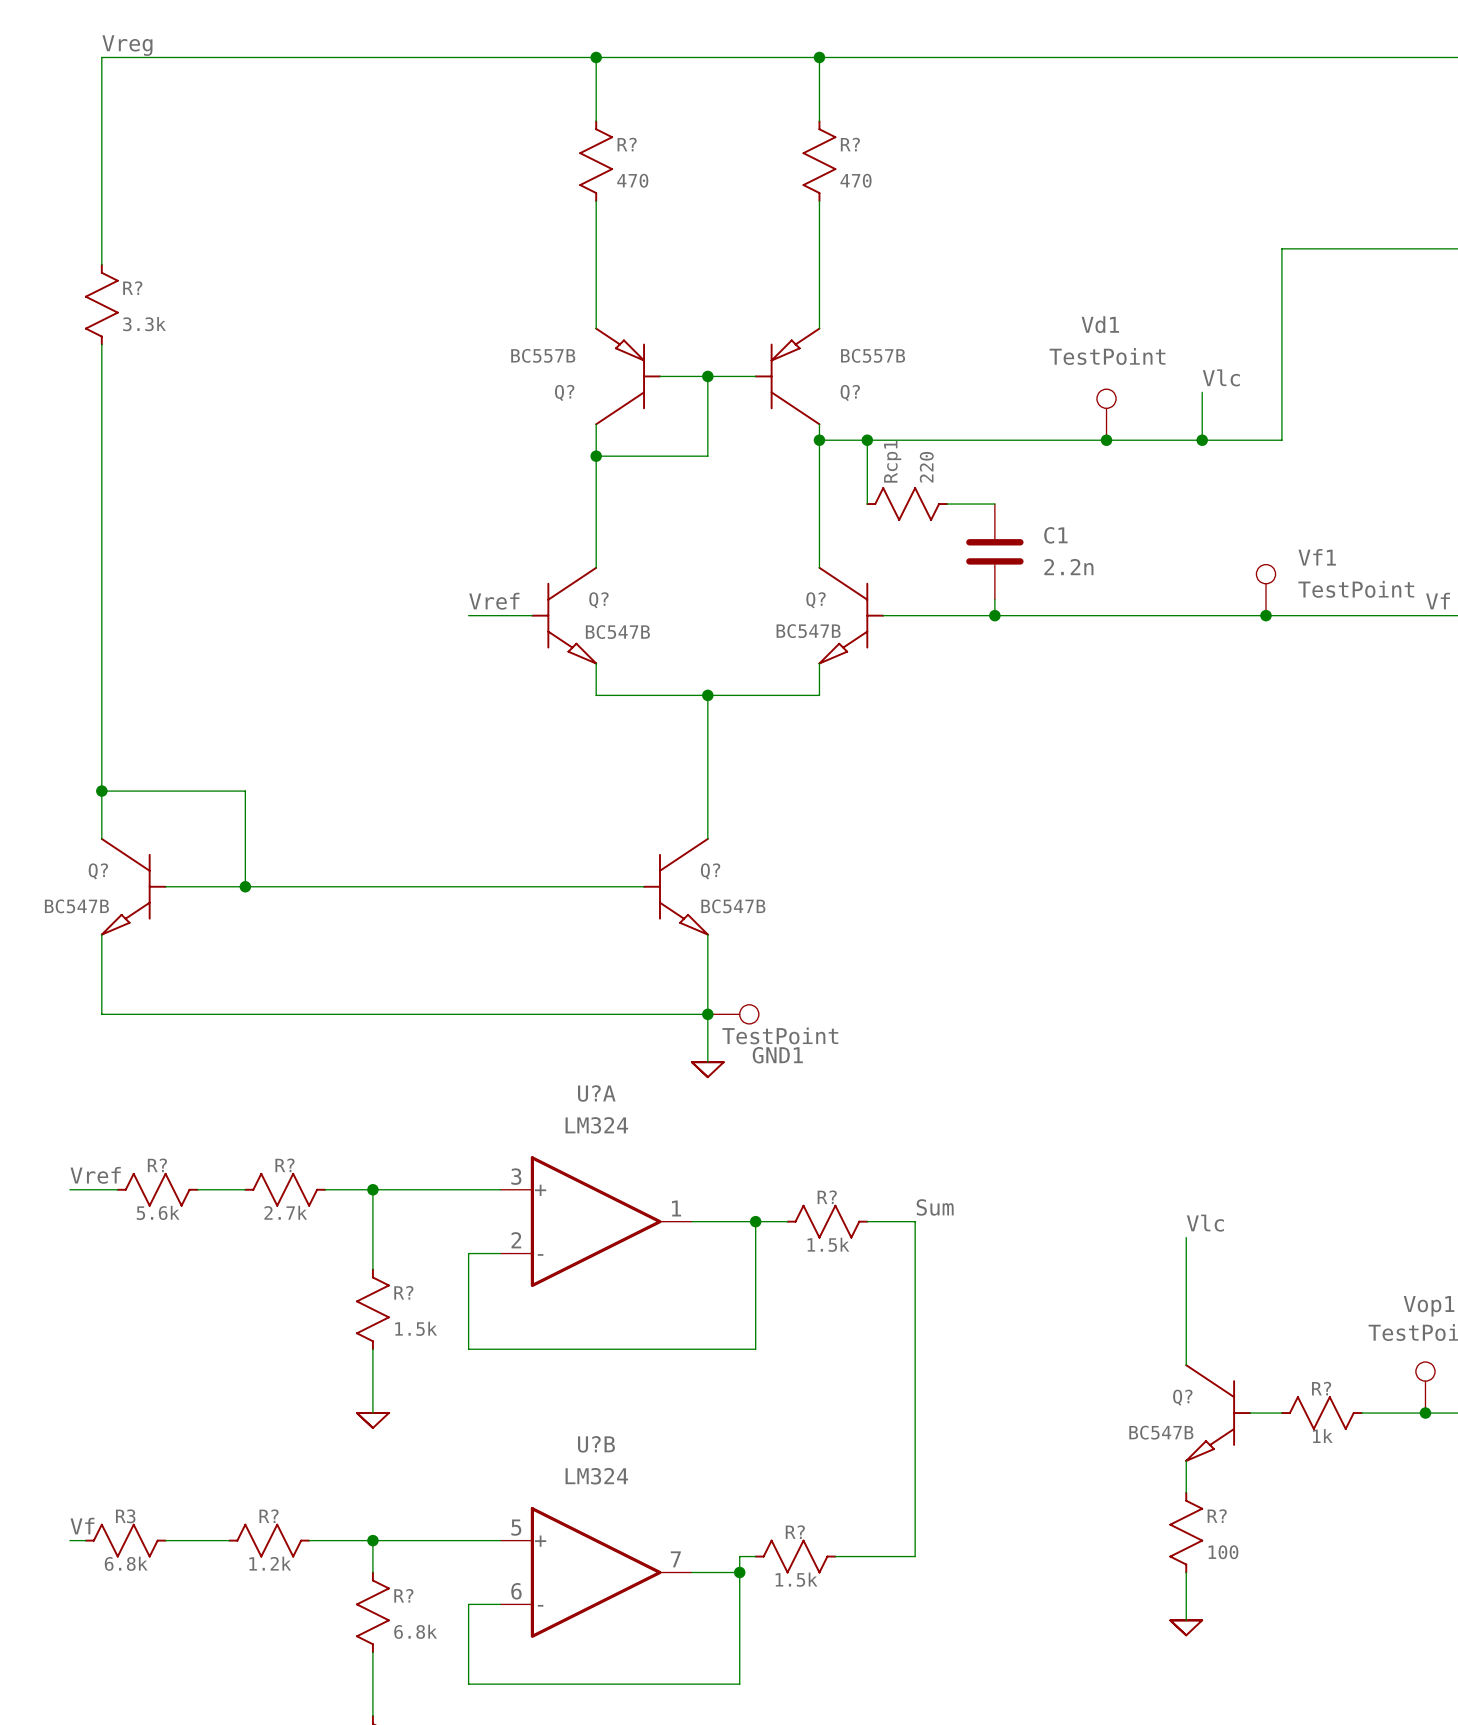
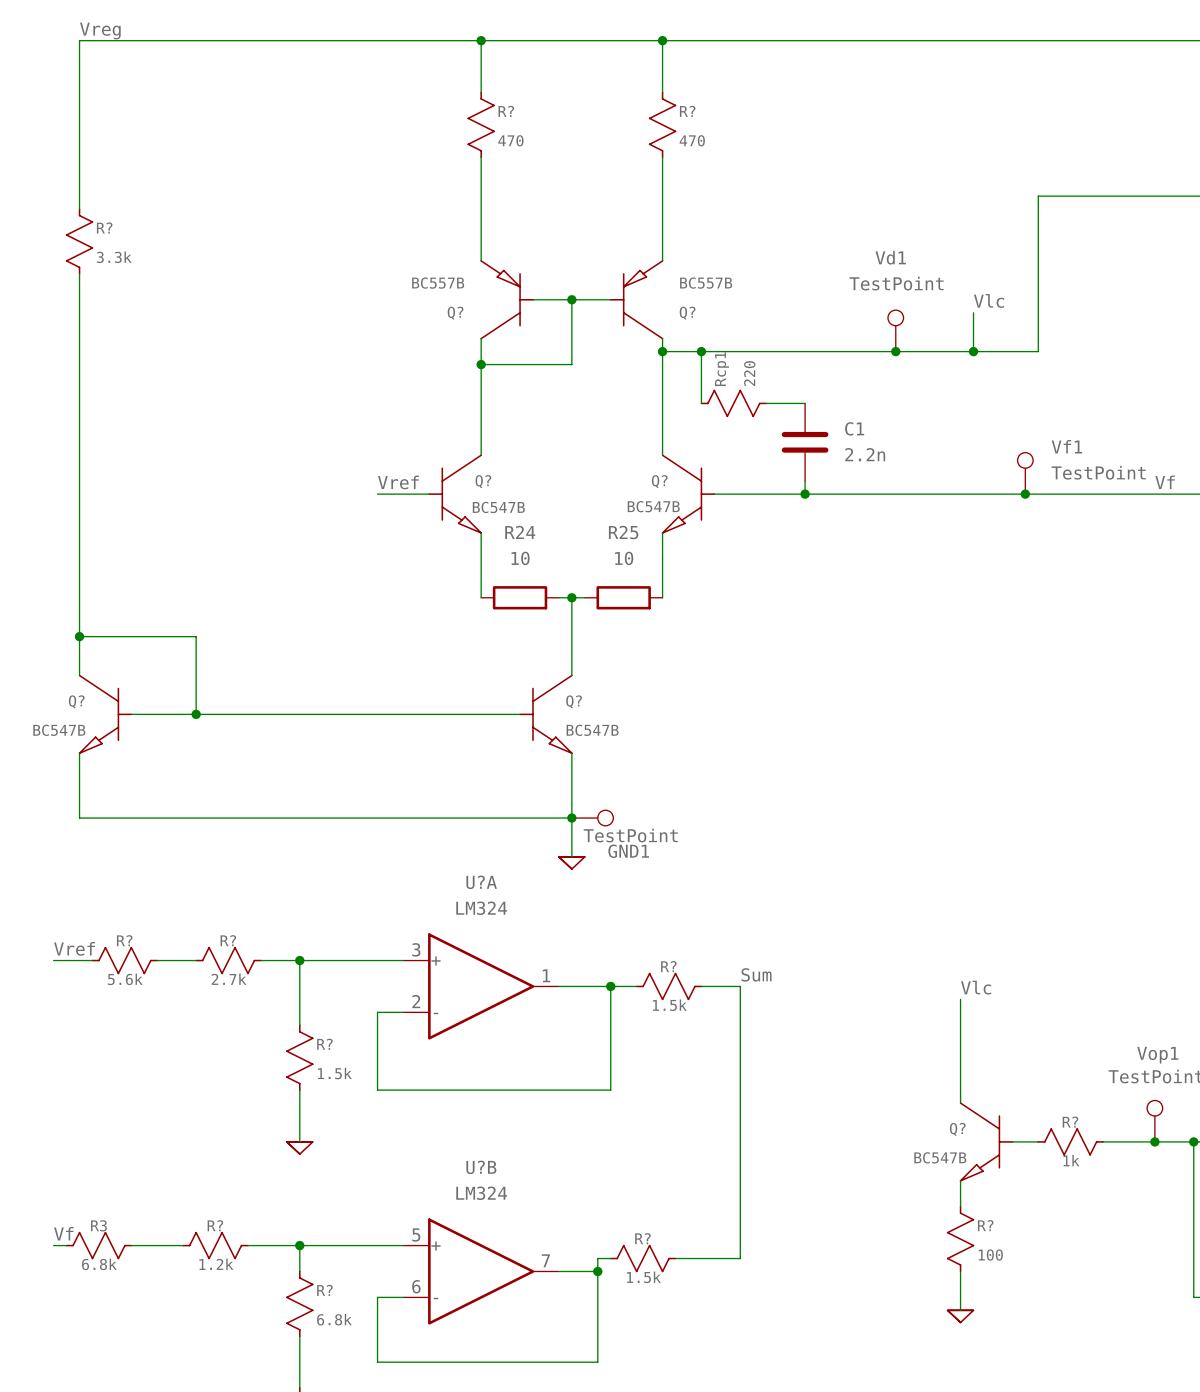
wire: (596, 695) (819, 695) -> (481, 558) (481, 597)
wire: (707, 695) (707, 743) -> (662, 558) (662, 597)
junction position: (707, 695) -> (571, 597)
R24: none -> 10 (520, 597)
wire: none -> (558, 597) (584, 597)
R25: none -> 10 (623, 597)

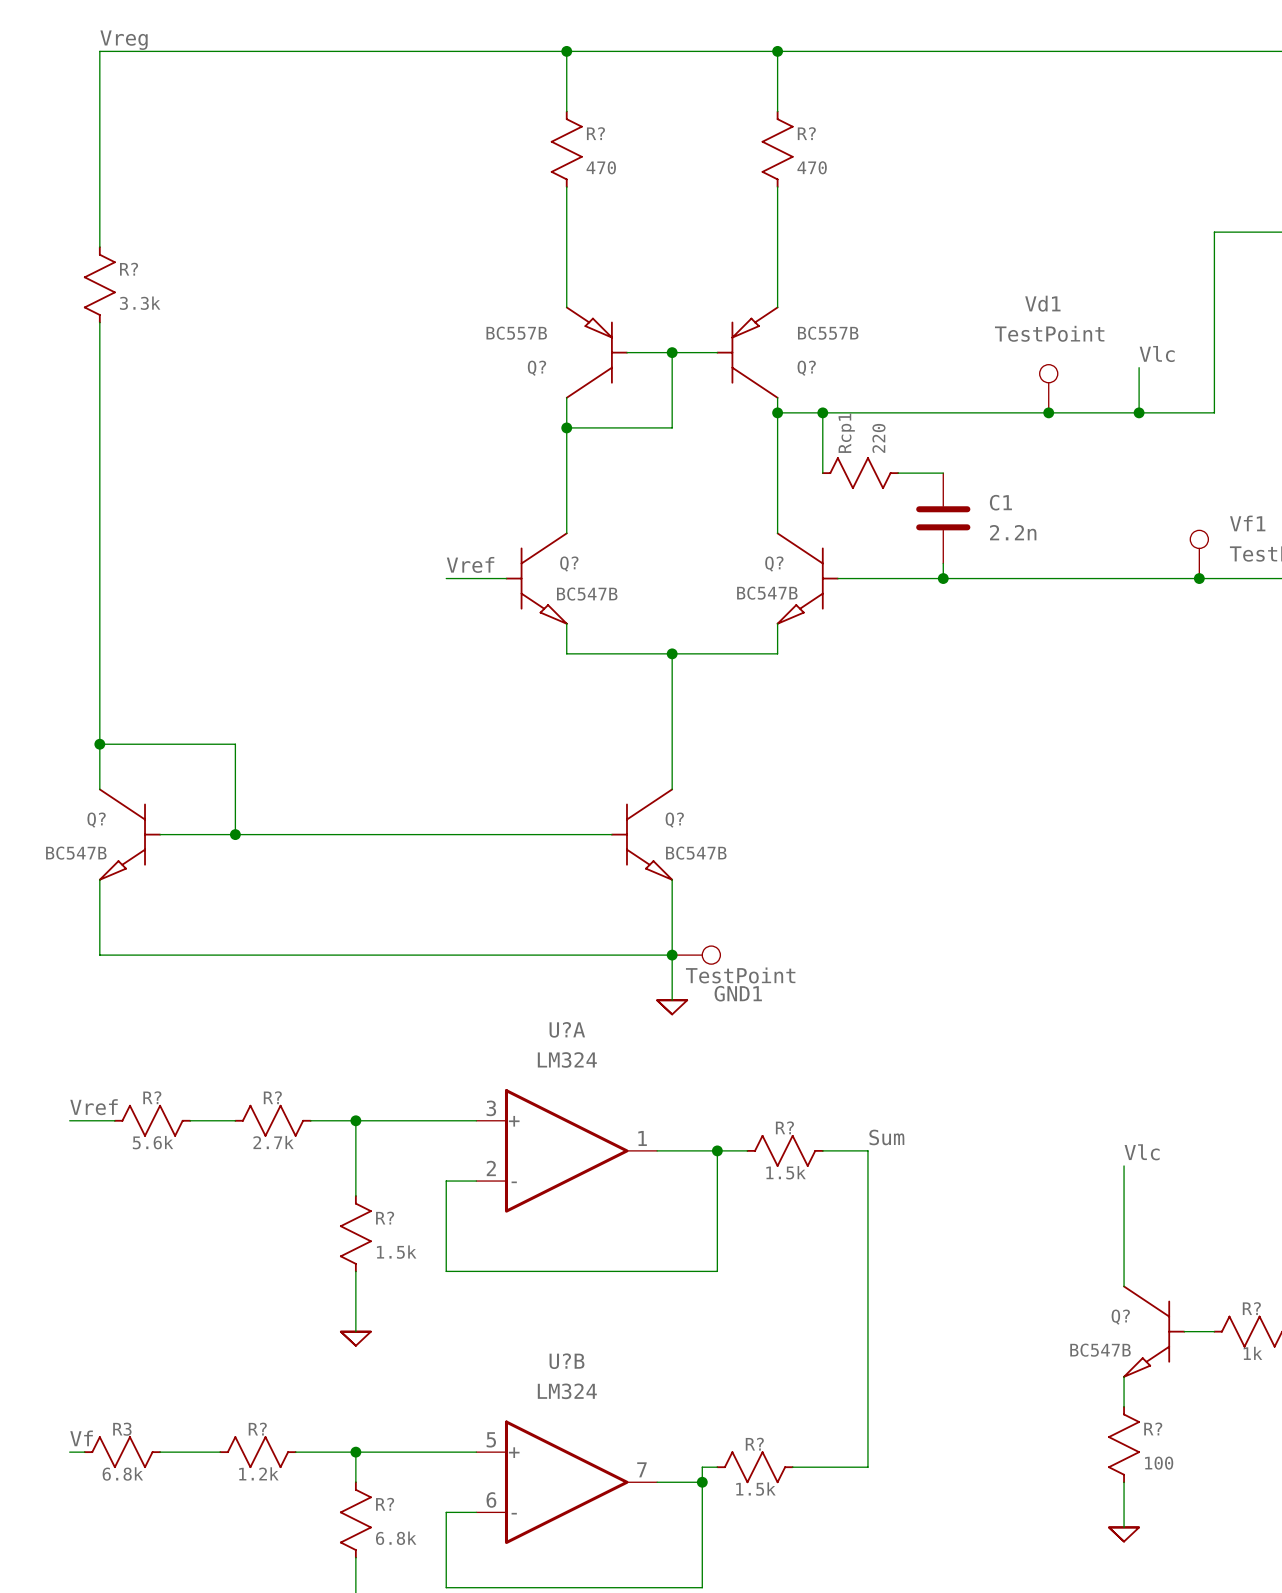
wire: (481, 558) (481, 597) -> (566, 653) (777, 653)
wire: (662, 558) (662, 597) -> (672, 653) (672, 699)
R24: 10 (520, 597) -> none
wire: (558, 597) (584, 597) -> none
junction position: (571, 597) -> (672, 653)
R25: 10 (623, 597) -> none

